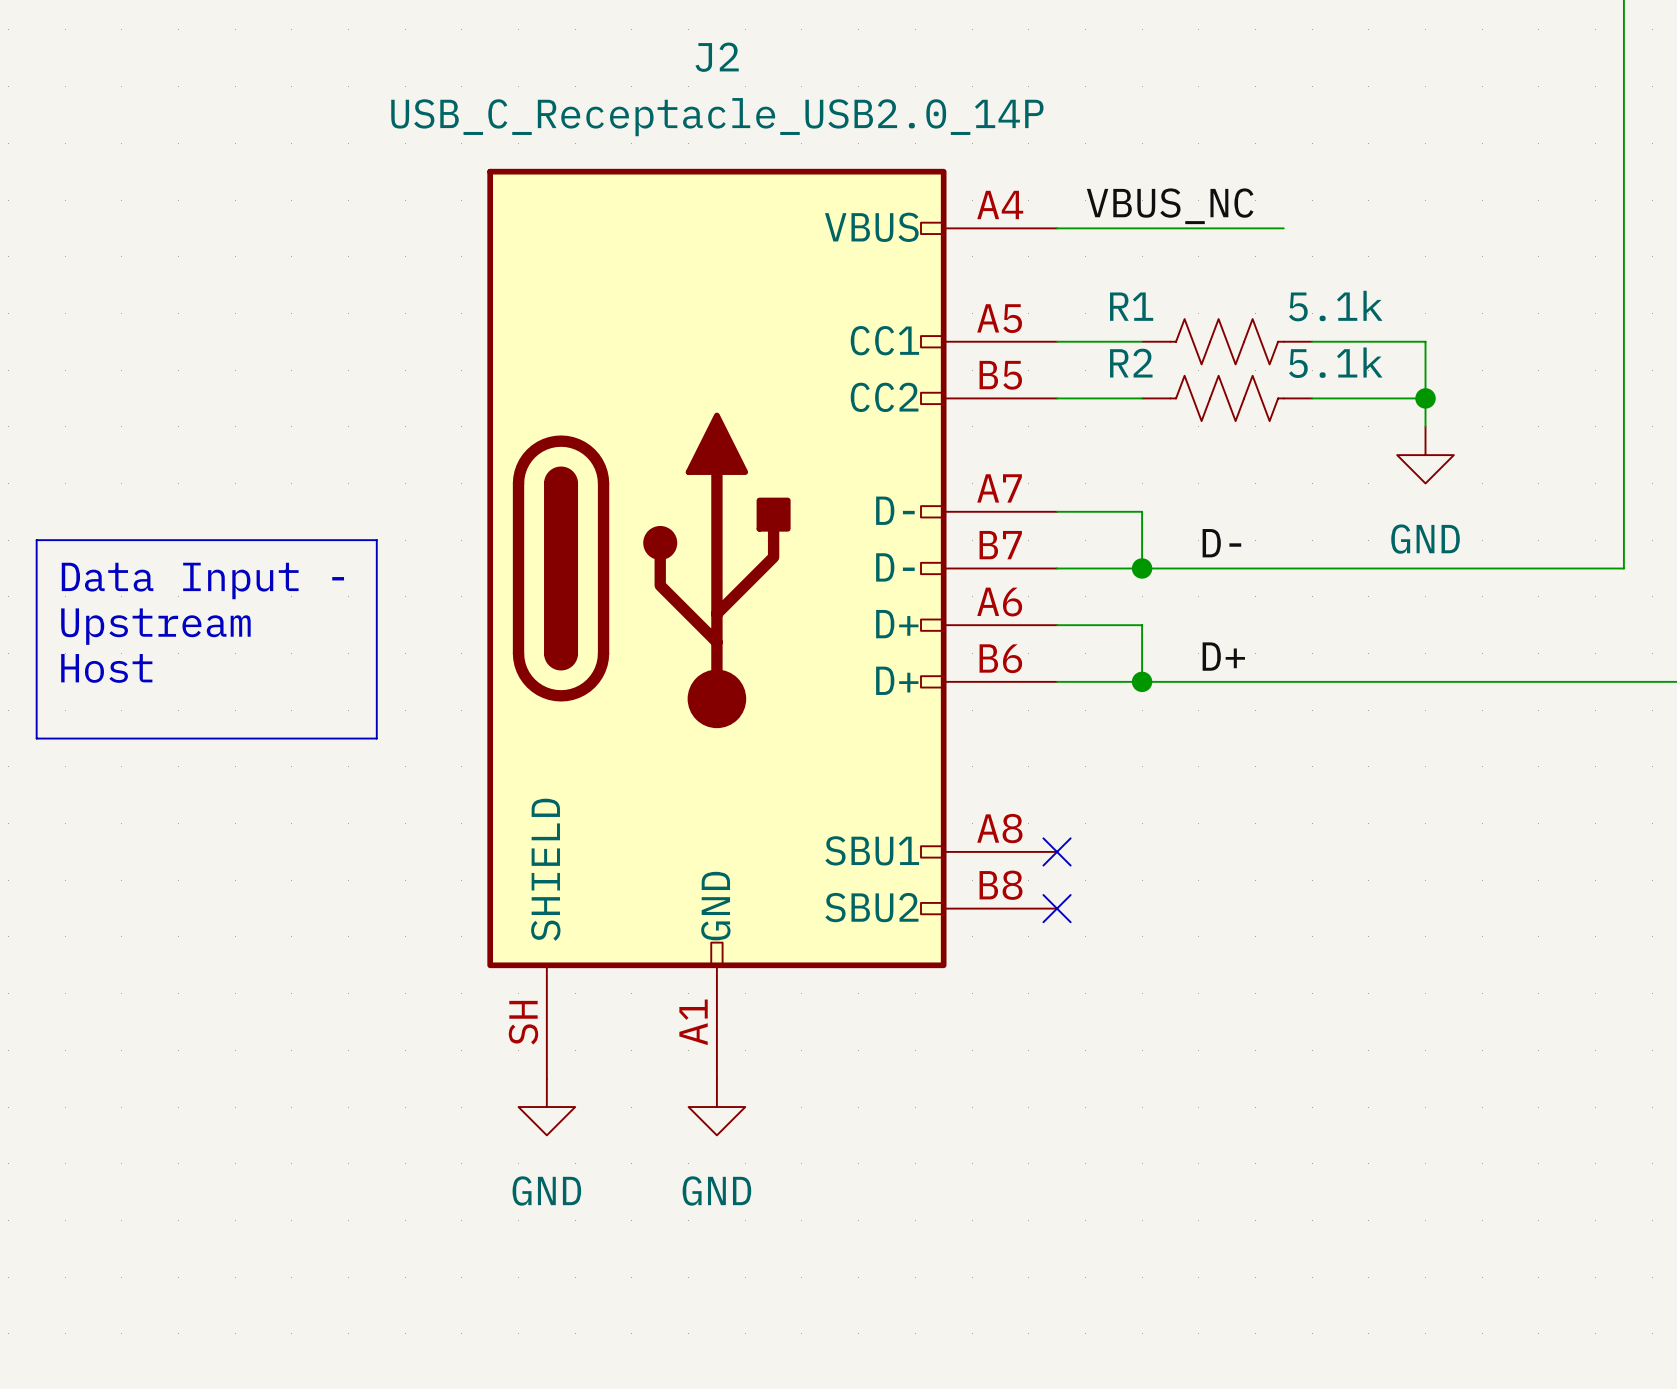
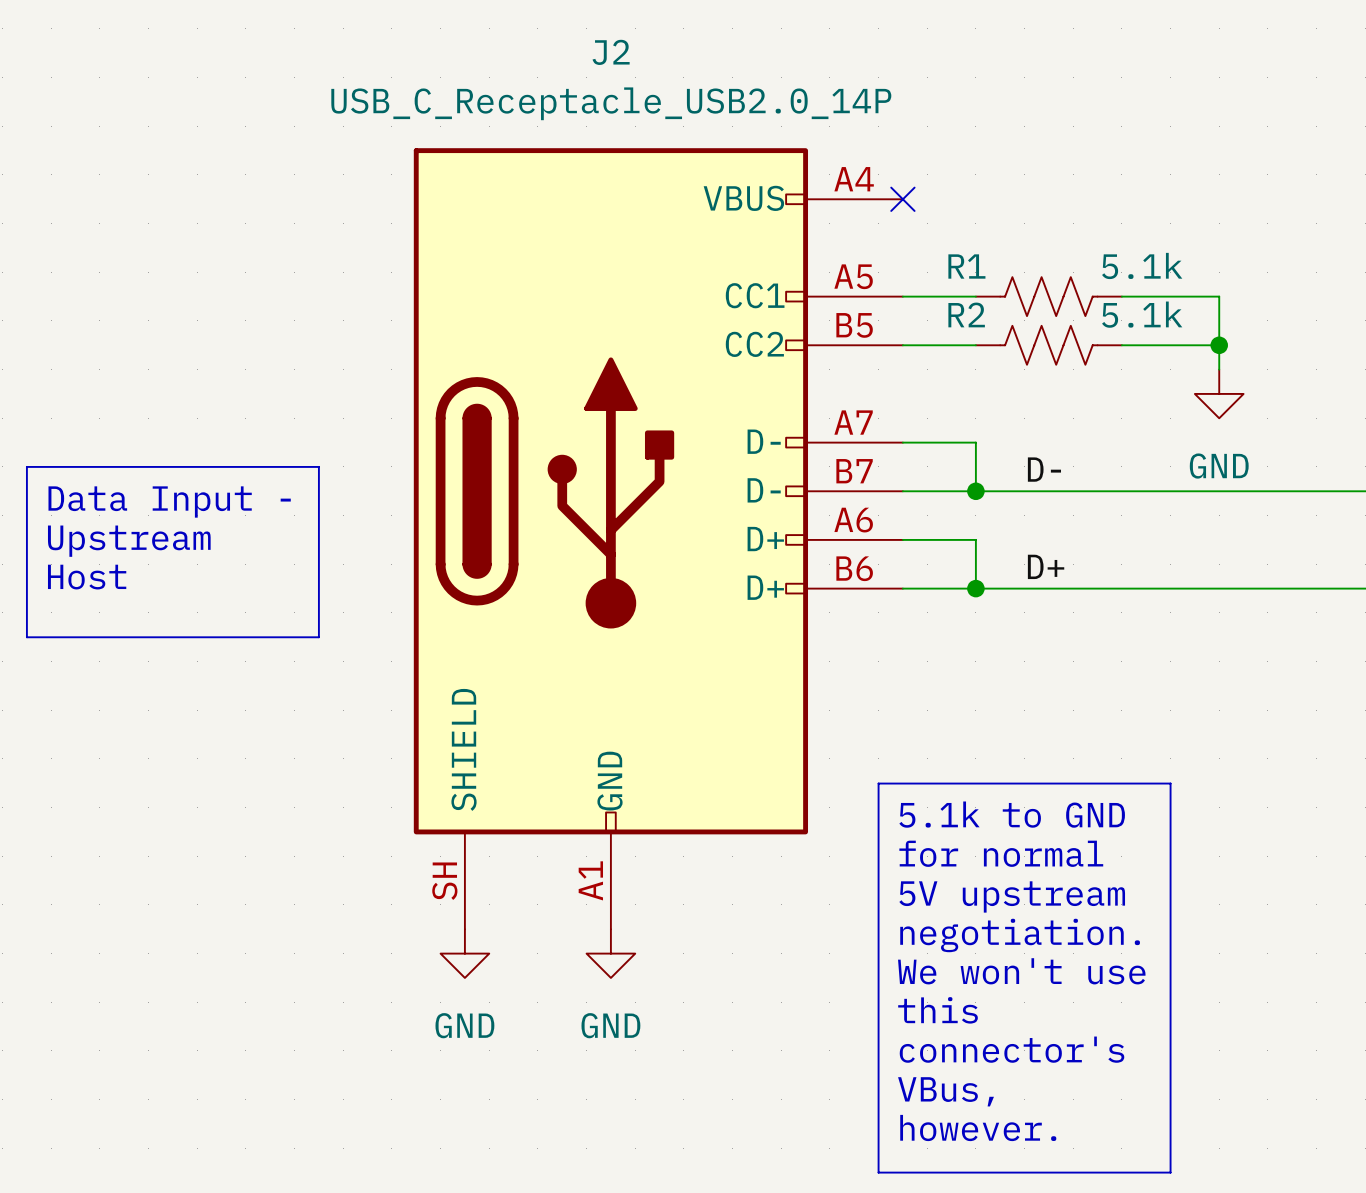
J2 symbol: [487, 168, 1058, 1079] -> [413, 148, 903, 930]
label: VBUS_NC (1170, 206) -> none
wire: (1057, 228) (1283, 228) -> none
no-connect mark: none -> (902, 199)
no-connect mark: (1057, 851) -> none
line: none -> (878, 783) (1170, 783) (1170, 1172) (878, 1172) (878, 783)
no-connect mark: (1057, 908) -> none
text: none -> 5.1k to GND (1012, 814)
text: none -> for normal (1001, 853)
text: none -> 5V upstream (1012, 896)
text: none -> negotiation. (1020, 935)
text: none -> We won't use (1021, 971)
text: none -> this (938, 1010)
text: none -> connector's (1012, 1049)
text: none -> VBus, (946, 1091)
text: none -> however. (978, 1128)

